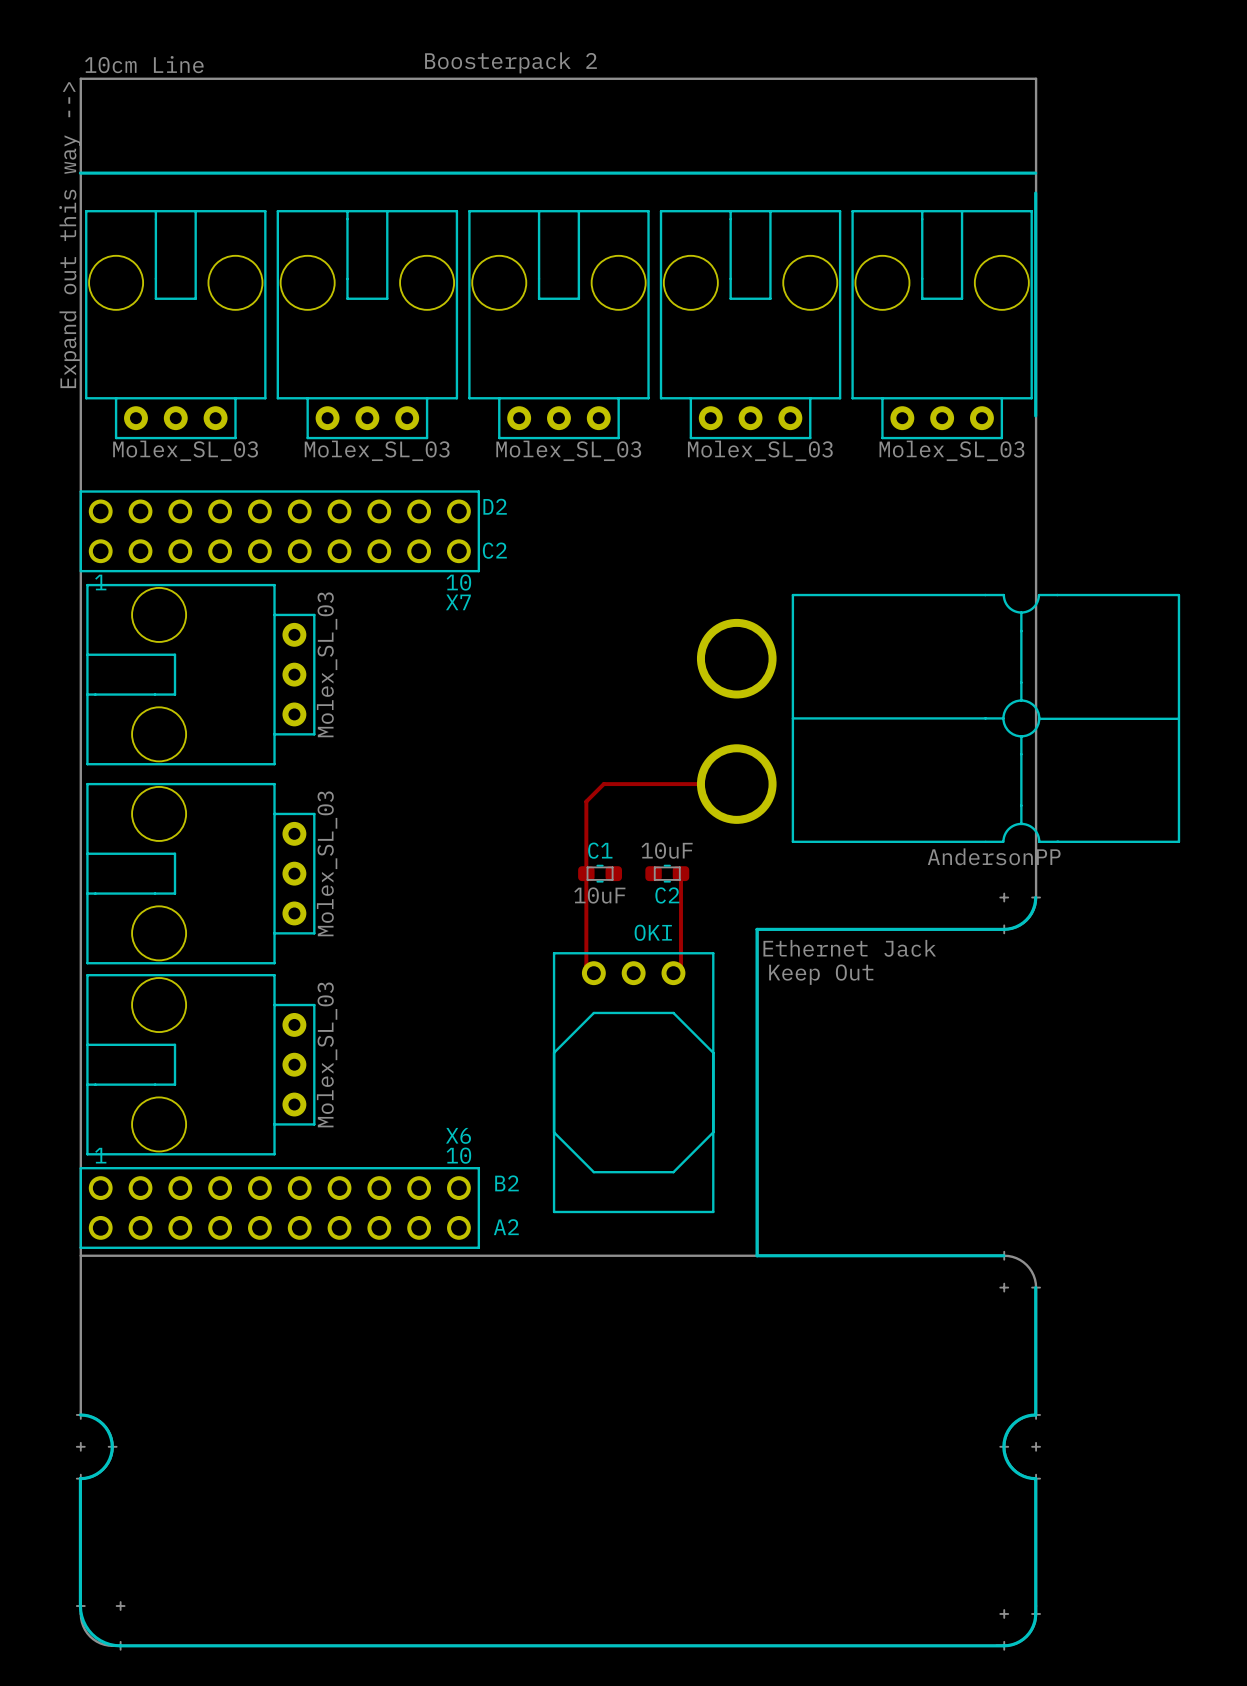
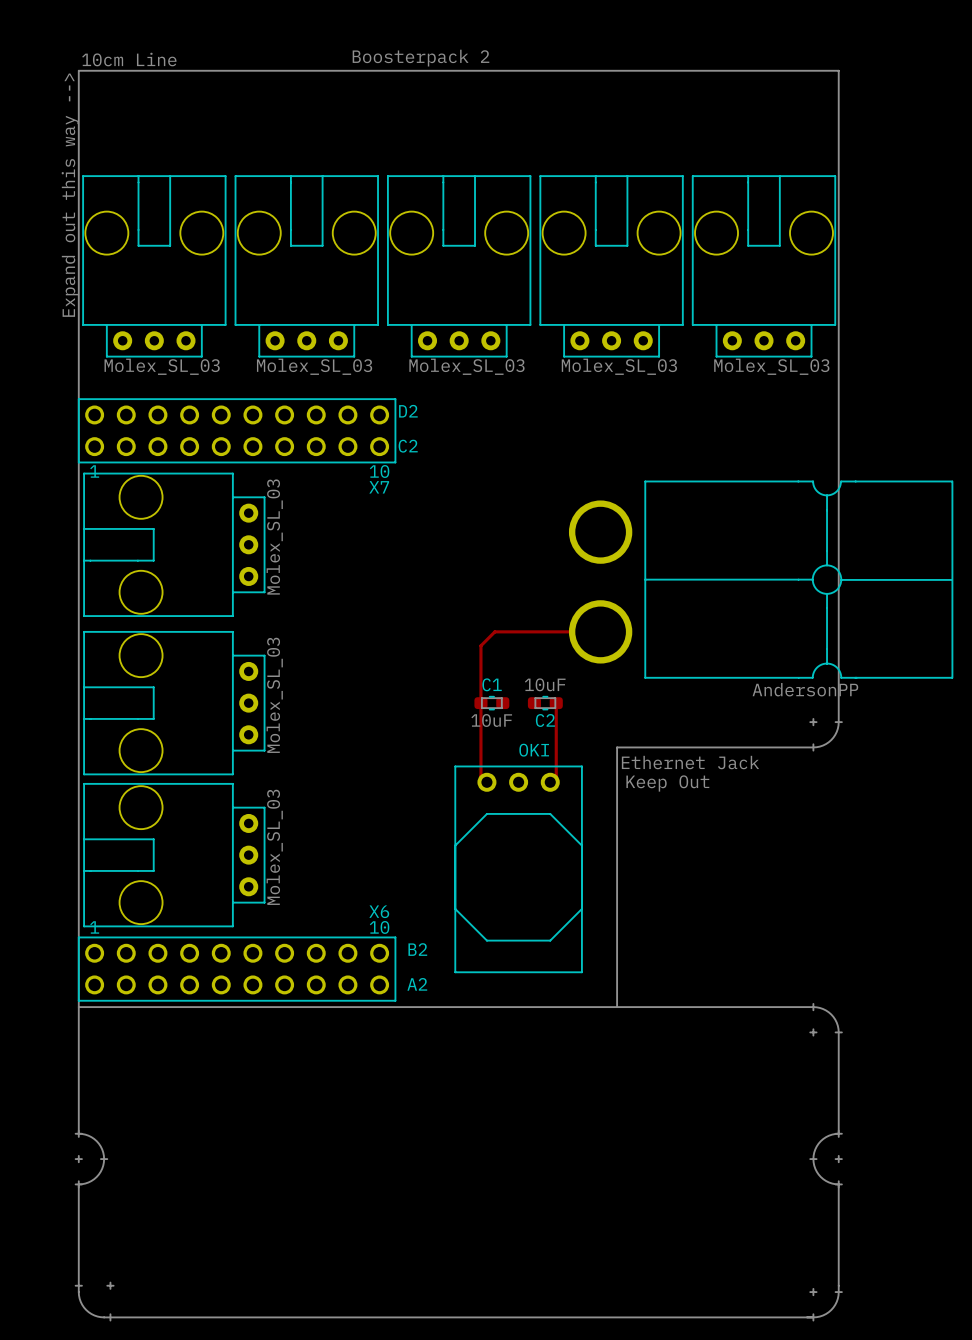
line: (80, 173) (1035, 173) -> none
line: (1035, 193) (1035, 415) -> none
line: (1035, 897) (1033, 909) (1029, 916) (1019, 925) (1008, 929) (757, 929) (757, 1255) (1003, 1255) -> none
line: (1035, 1287) (1035, 1414) (1023, 1417) (1013, 1424) (1006, 1434) (1003, 1446) (1006, 1459) (1013, 1469) (1023, 1476) (1035, 1478) (1035, 1618) (1031, 1629) (1026, 1636) (1016, 1643) (1008, 1645) (109, 1644) (92, 1634) (85, 1625) (80, 1611) (80, 1478) (96, 1474) (105, 1466) (111, 1455) (111, 1442) (107, 1430) (99, 1421) (88, 1416) (80, 1414) -> none

